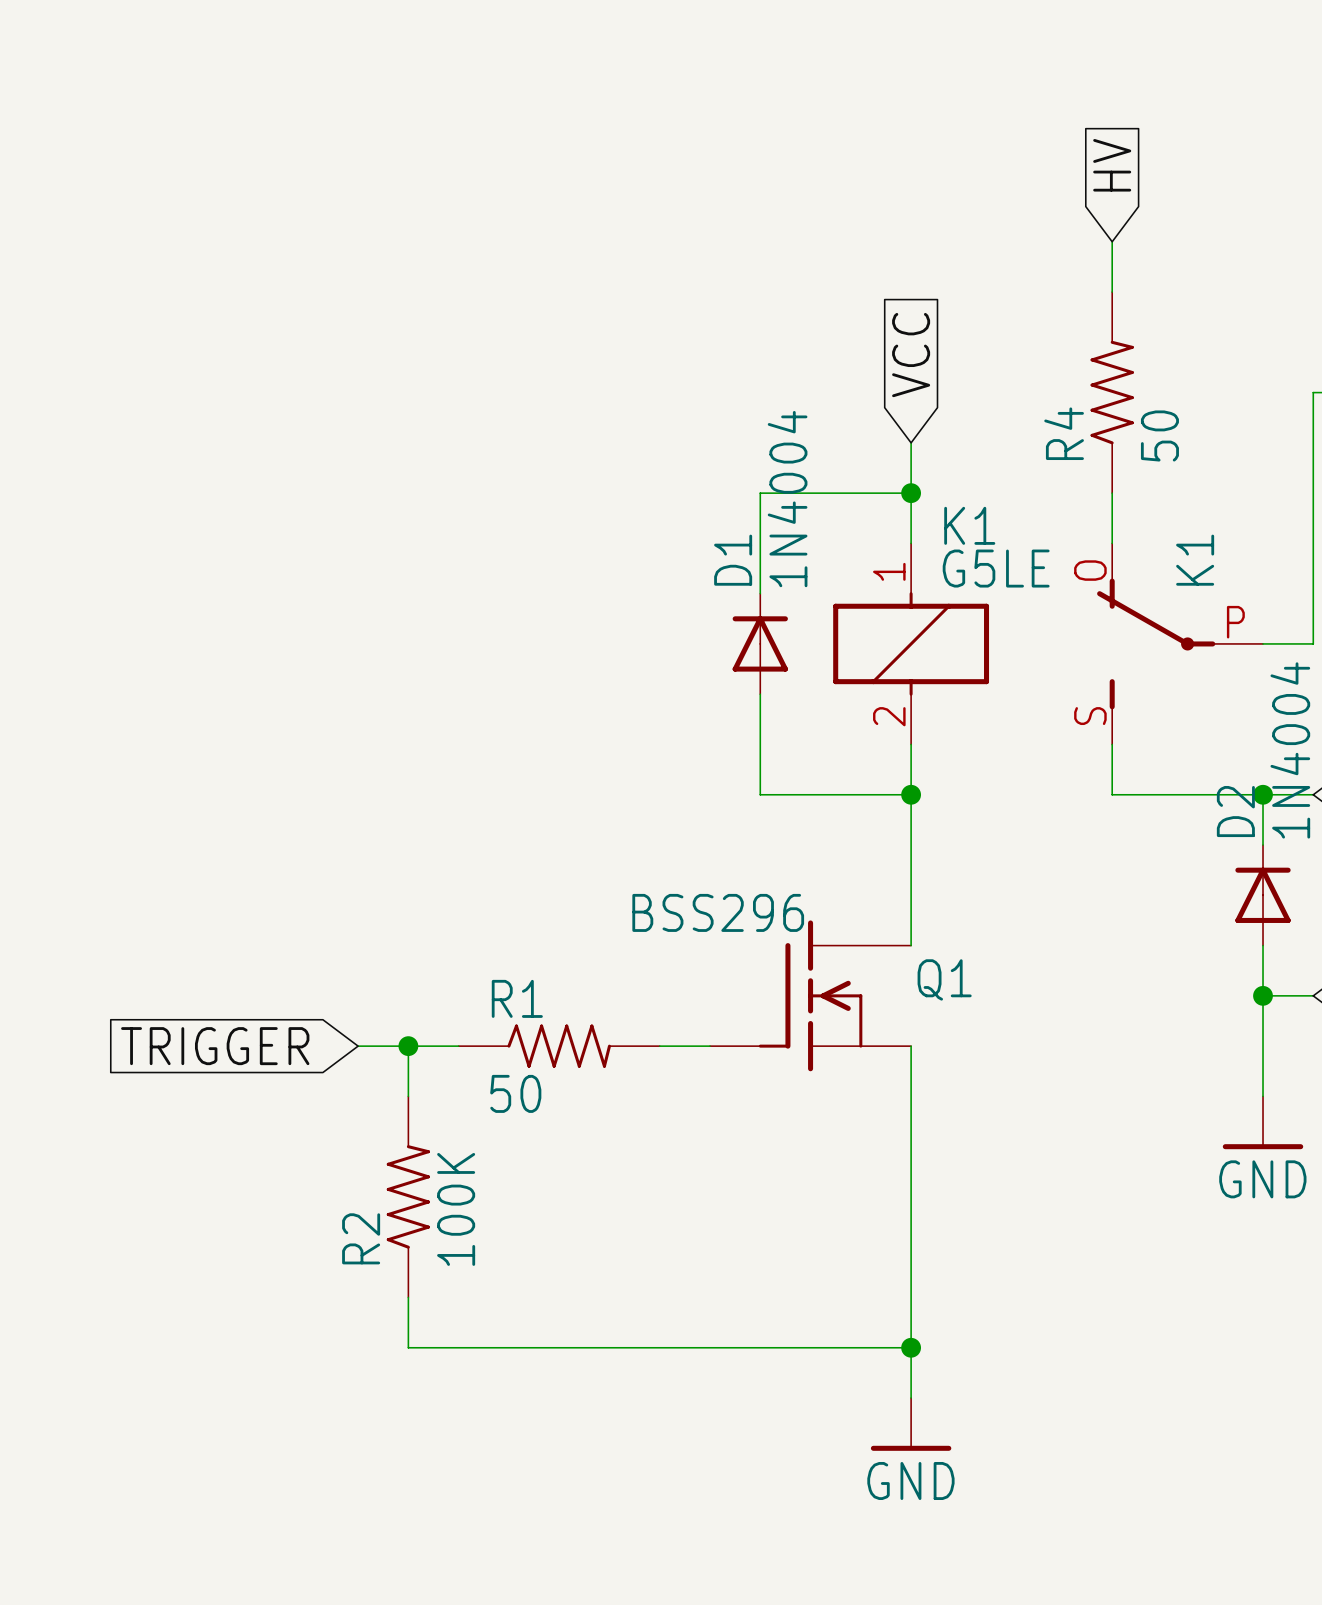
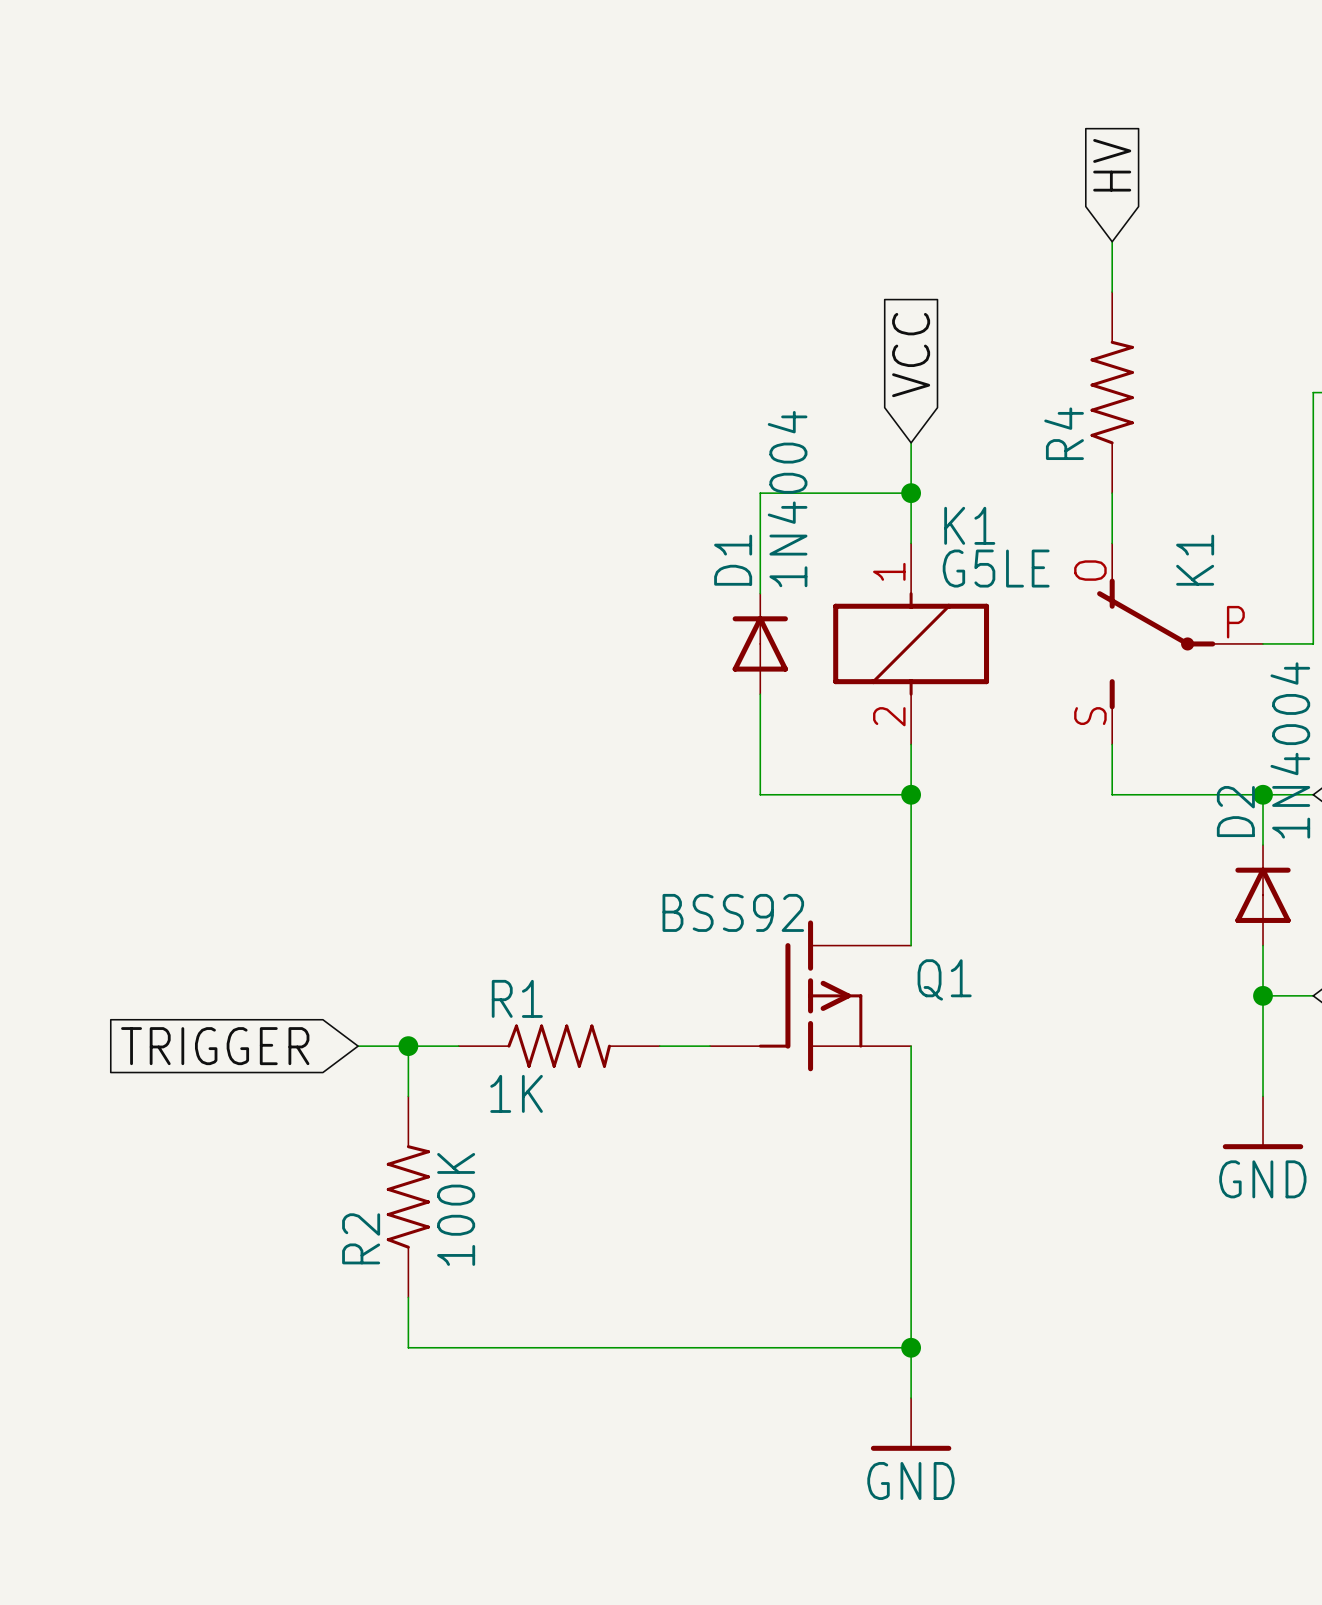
R4 value: 50 (1159, 435) -> none
Q1 value: BSS296 (718, 912) -> BSS92 (733, 912)
Q1 symbol: [710, 920, 912, 1072] -> [710, 920, 912, 1072]
R1 value: 50 (515, 1093) -> 1K (516, 1093)

